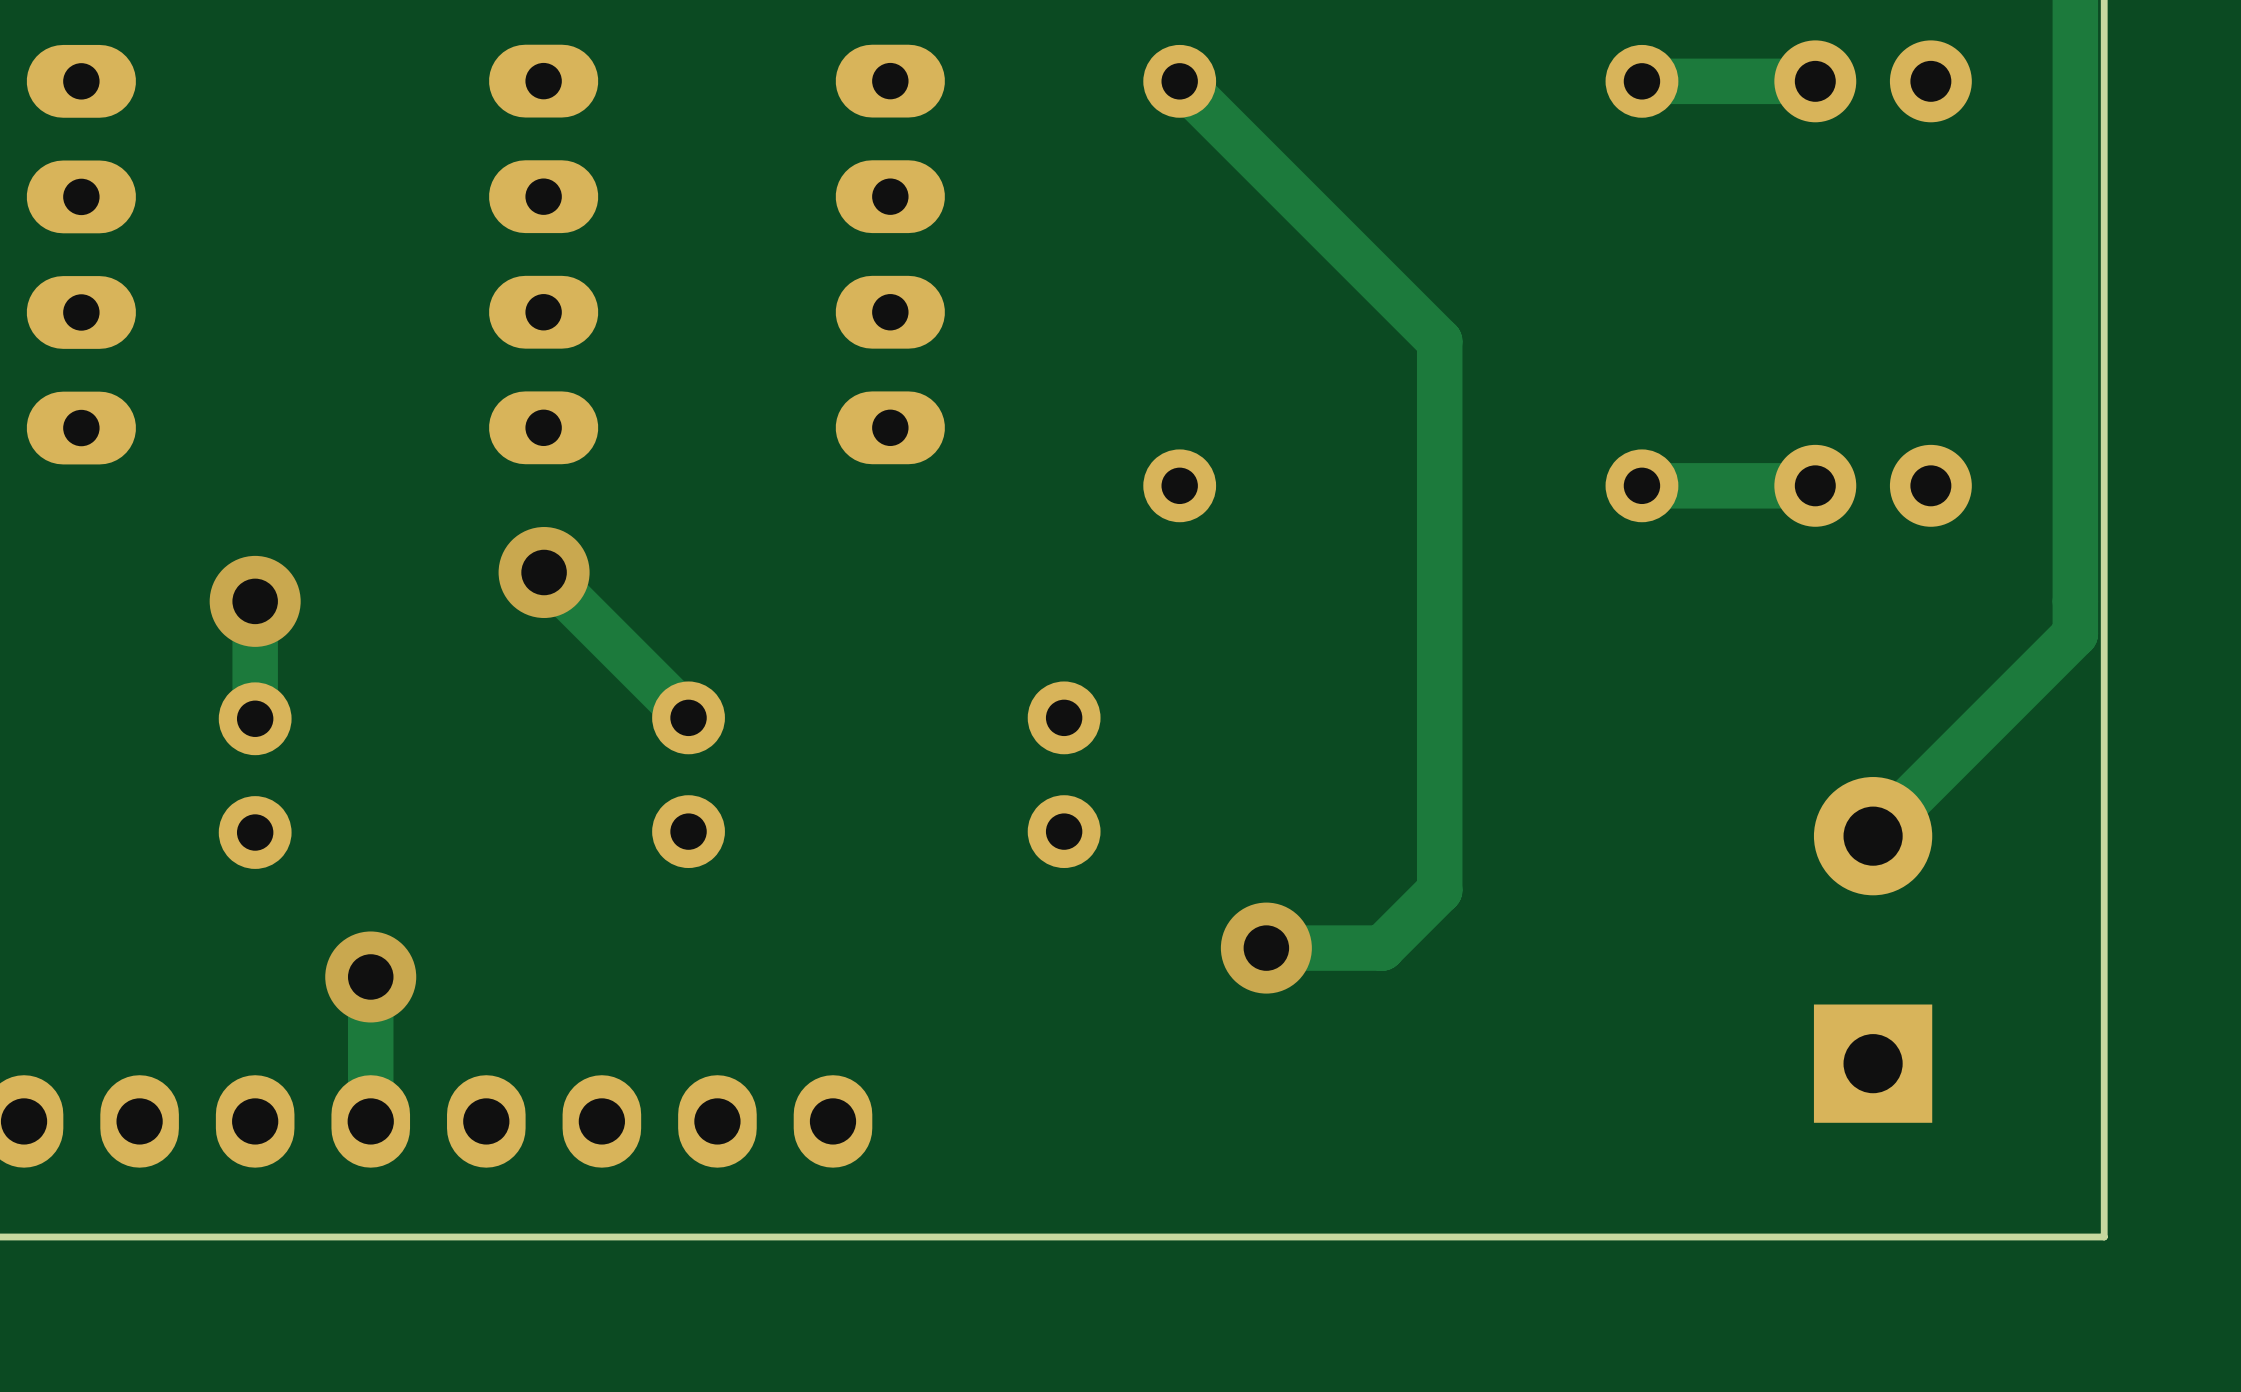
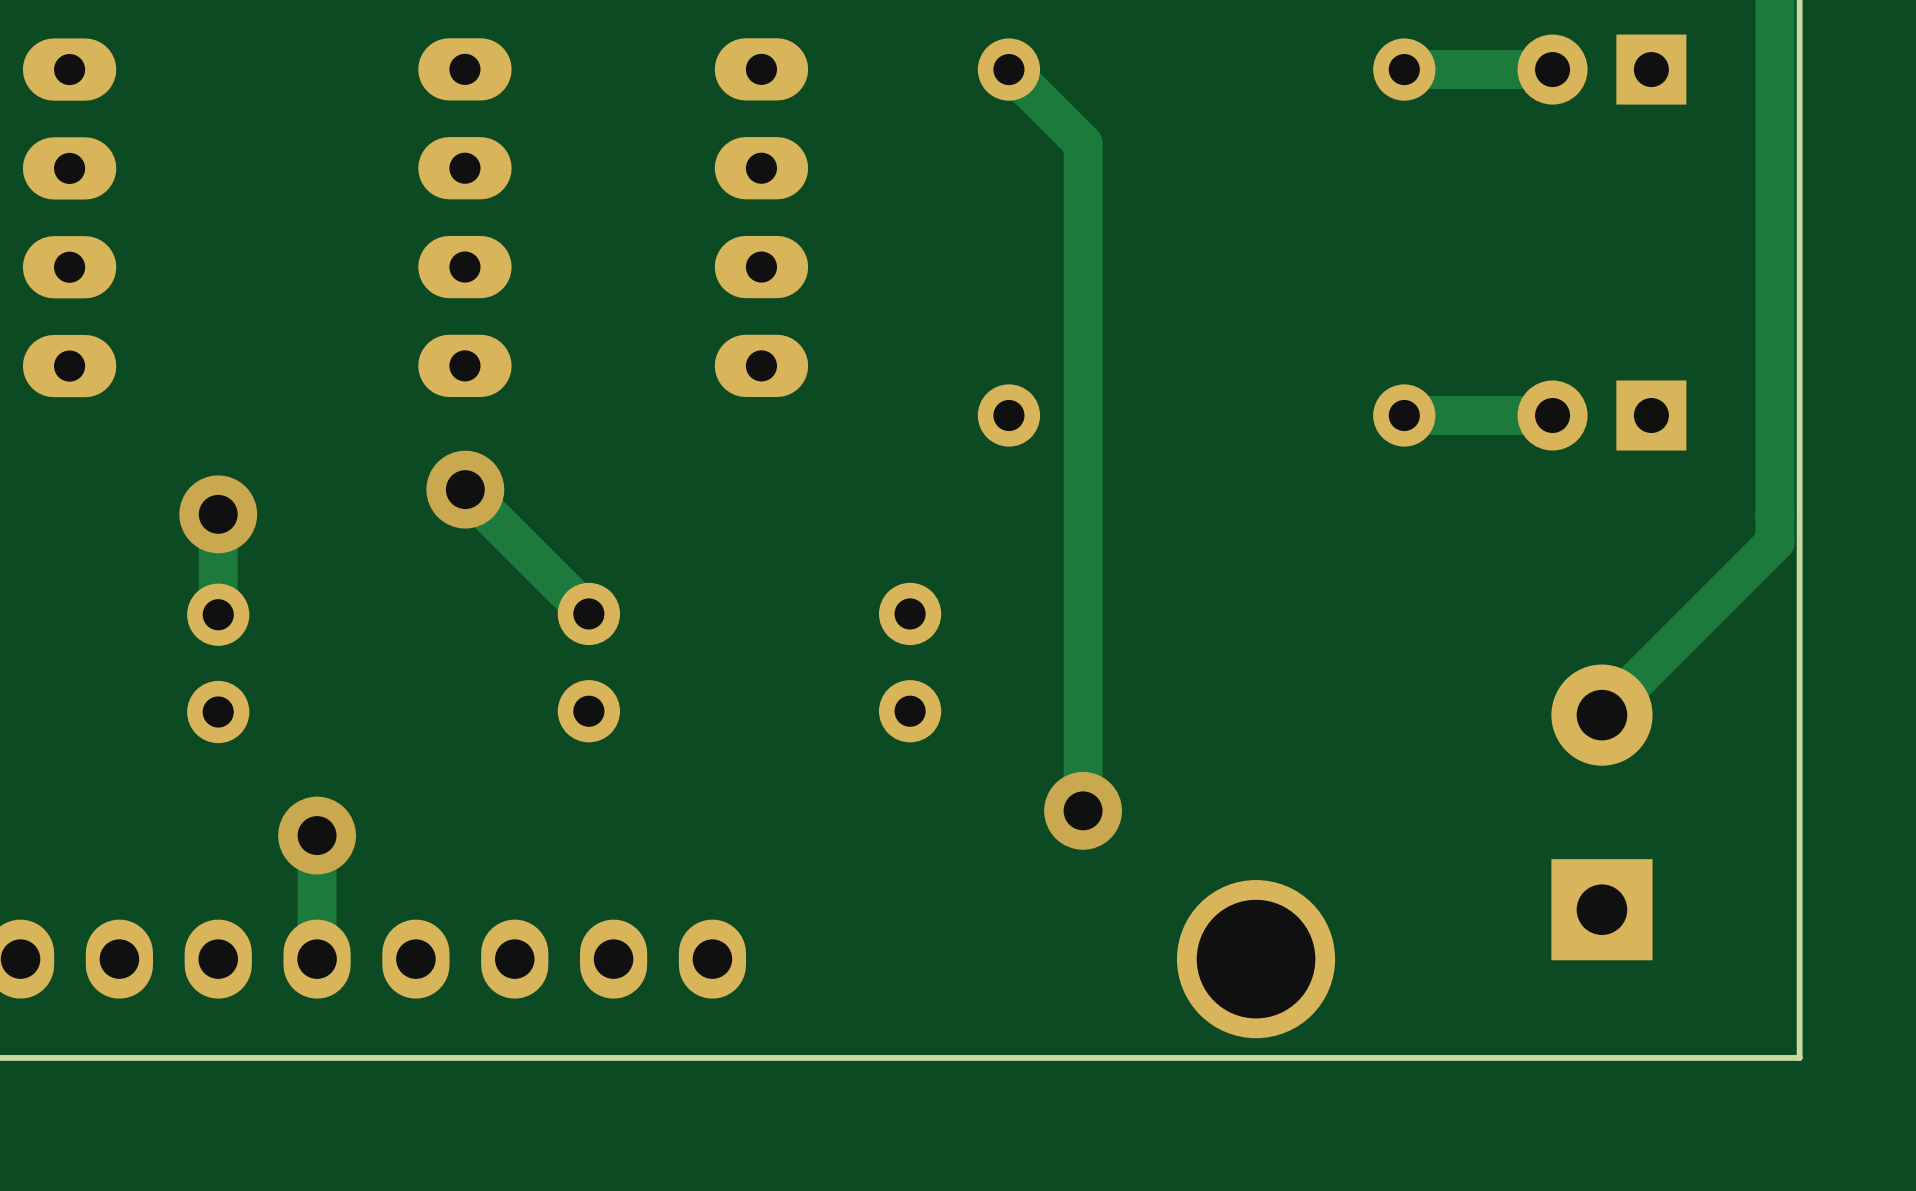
part footprint: [1774, 40, 1972, 123] -> [1517, 34, 1687, 105]
track: (1266, 168) (1439, 341) (1439, 890) (1381, 948) (1266, 948) -> (1083, 143) (1083, 810)
part footprint: [1774, 444, 1972, 527] -> [1517, 380, 1687, 451]
part: none -> (1256, 959)

